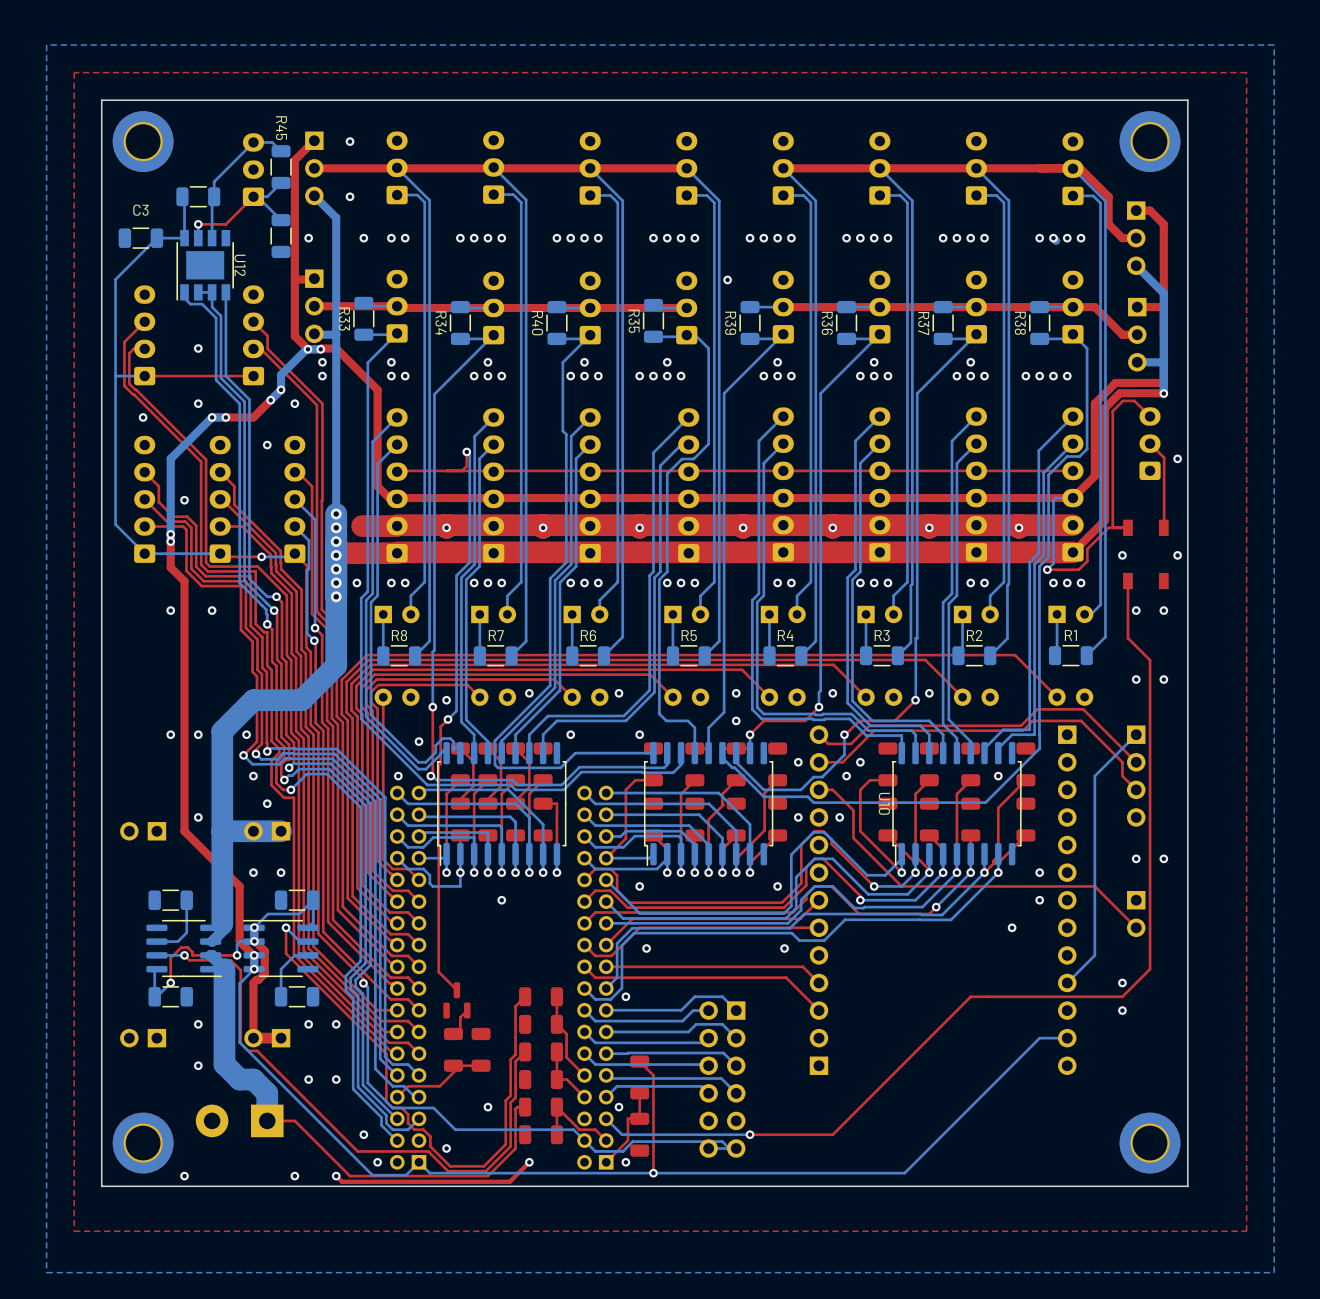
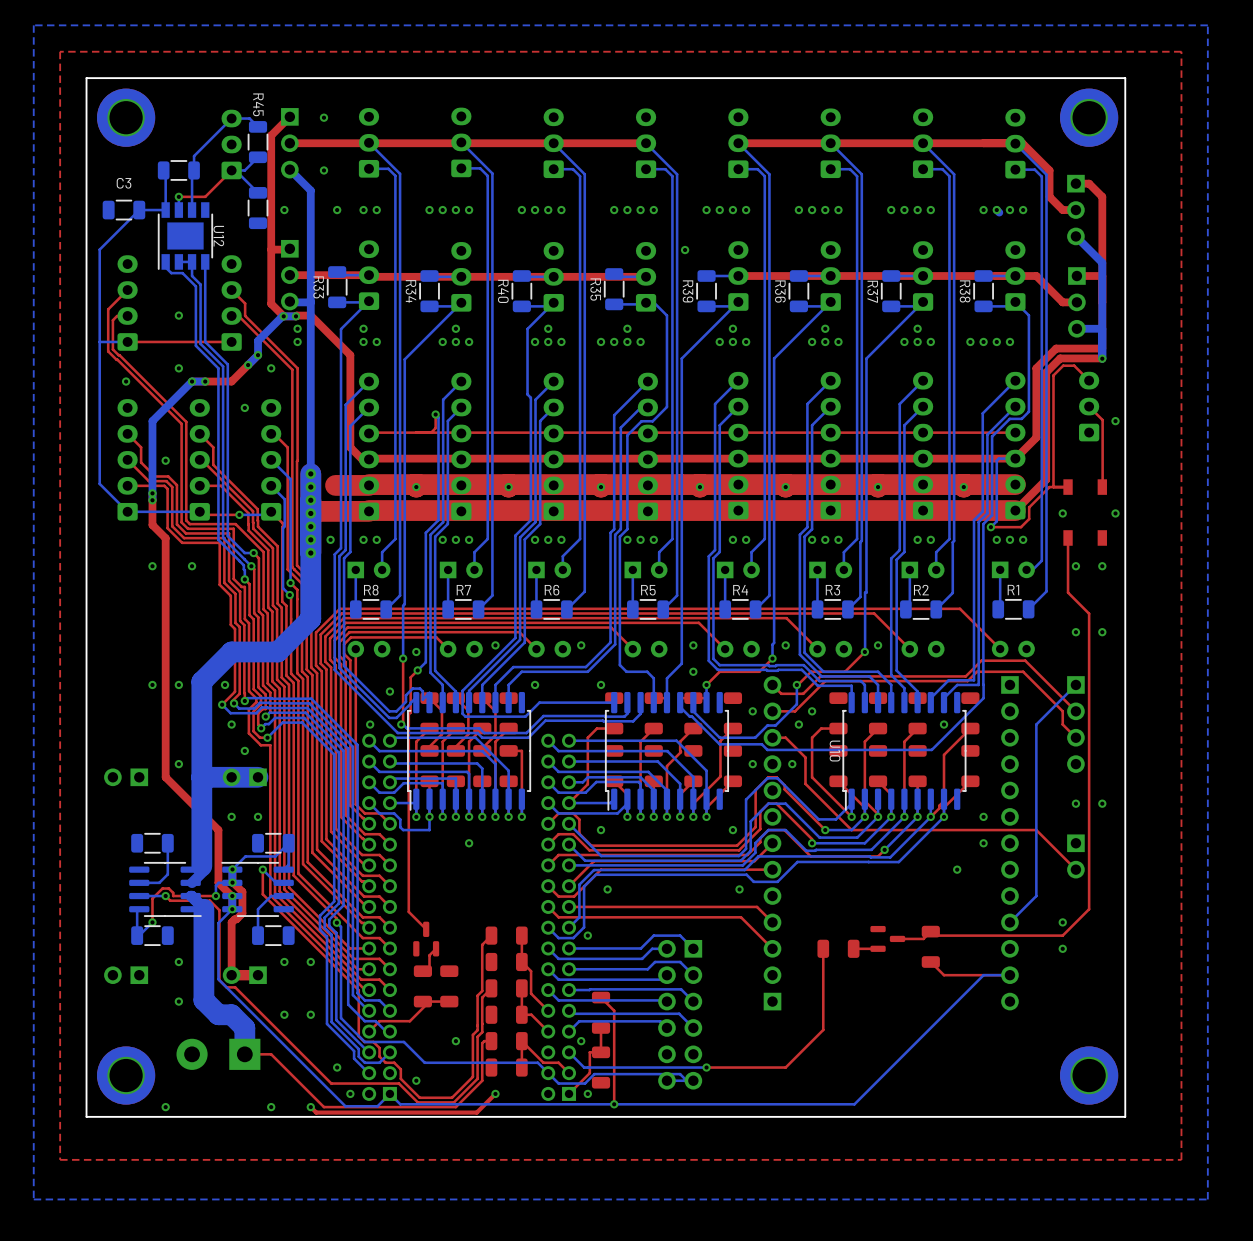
top track: (988, 996) (970, 996) (872, 1095) -> (823, 948) (823, 1029)
top track: none -> (934, 935) (930, 931) (923, 938) (897, 938)
part: none -> (887, 938)
part: none -> (930, 946)
part: none -> (838, 948)
top track: none -> (878, 948) (853, 948)
top track: none -> (930, 961) (944, 975) (1009, 975)

